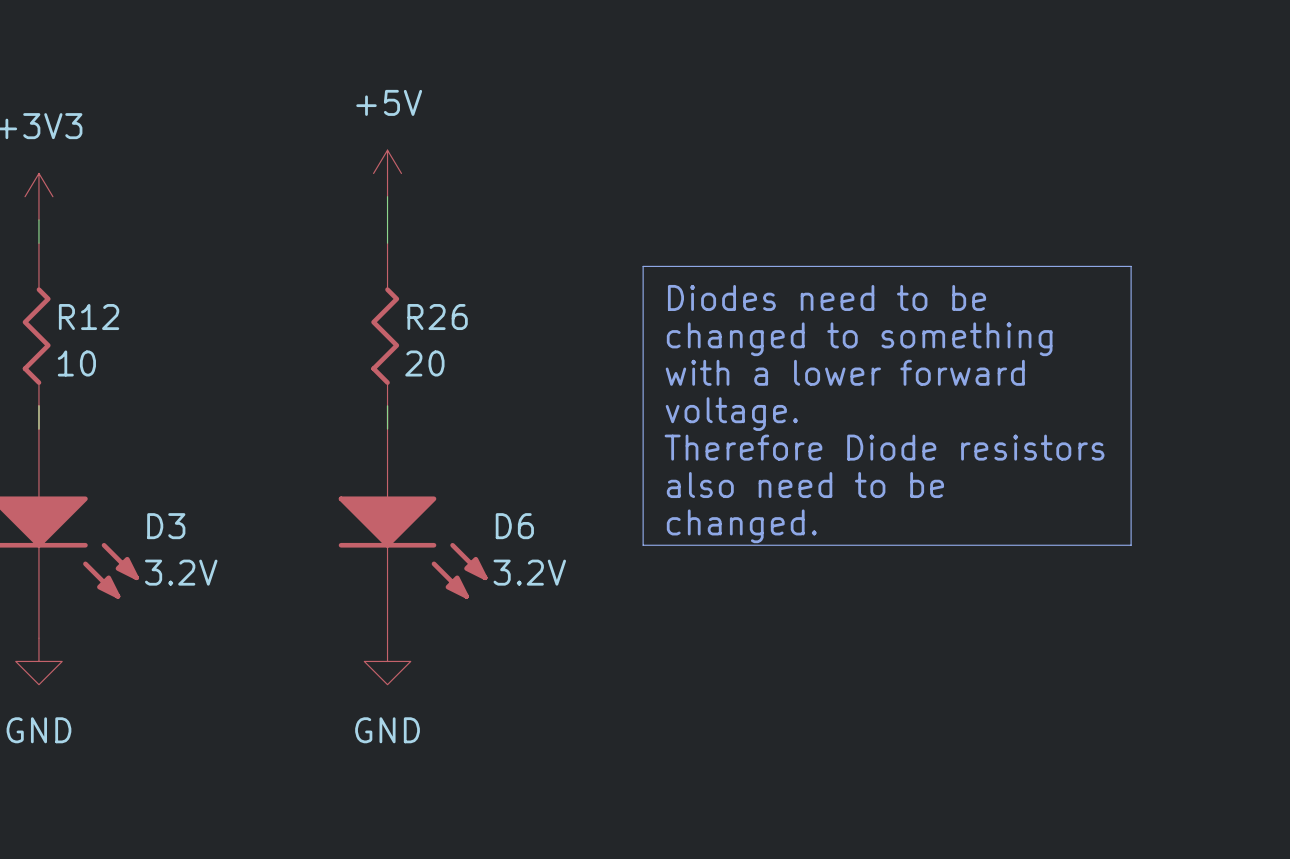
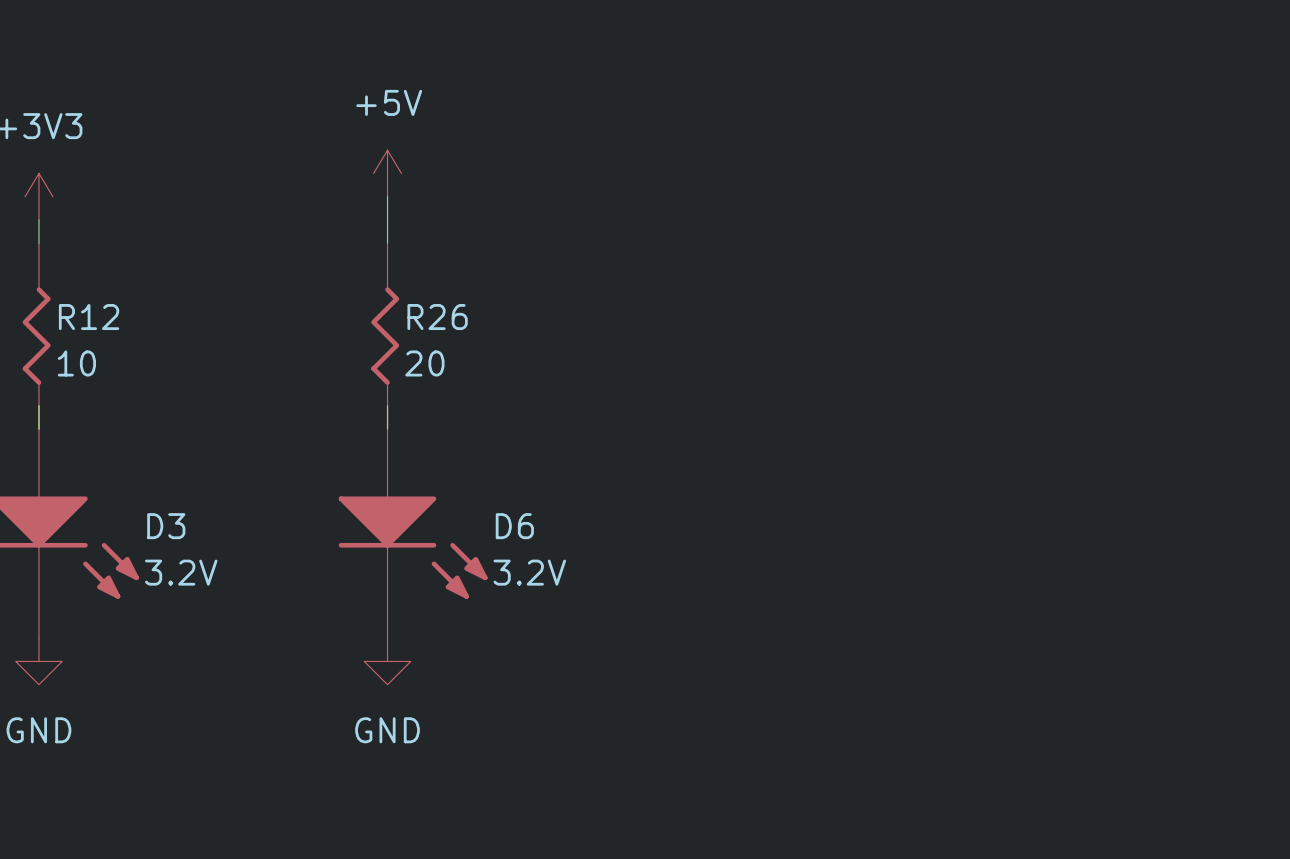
line: (643, 266) (1131, 266) (1131, 545) (643, 545) (643, 266) -> none
text: Diodes need to be (827, 297) -> none
text: changed to something (859, 339) -> none
text: with a lower forward (845, 372) -> none
text: voltage. (731, 414) -> none
text: Therefore Diode resistors (884, 447) -> none
text: also need to be (805, 485) -> none
text: changed. (741, 526) -> none

